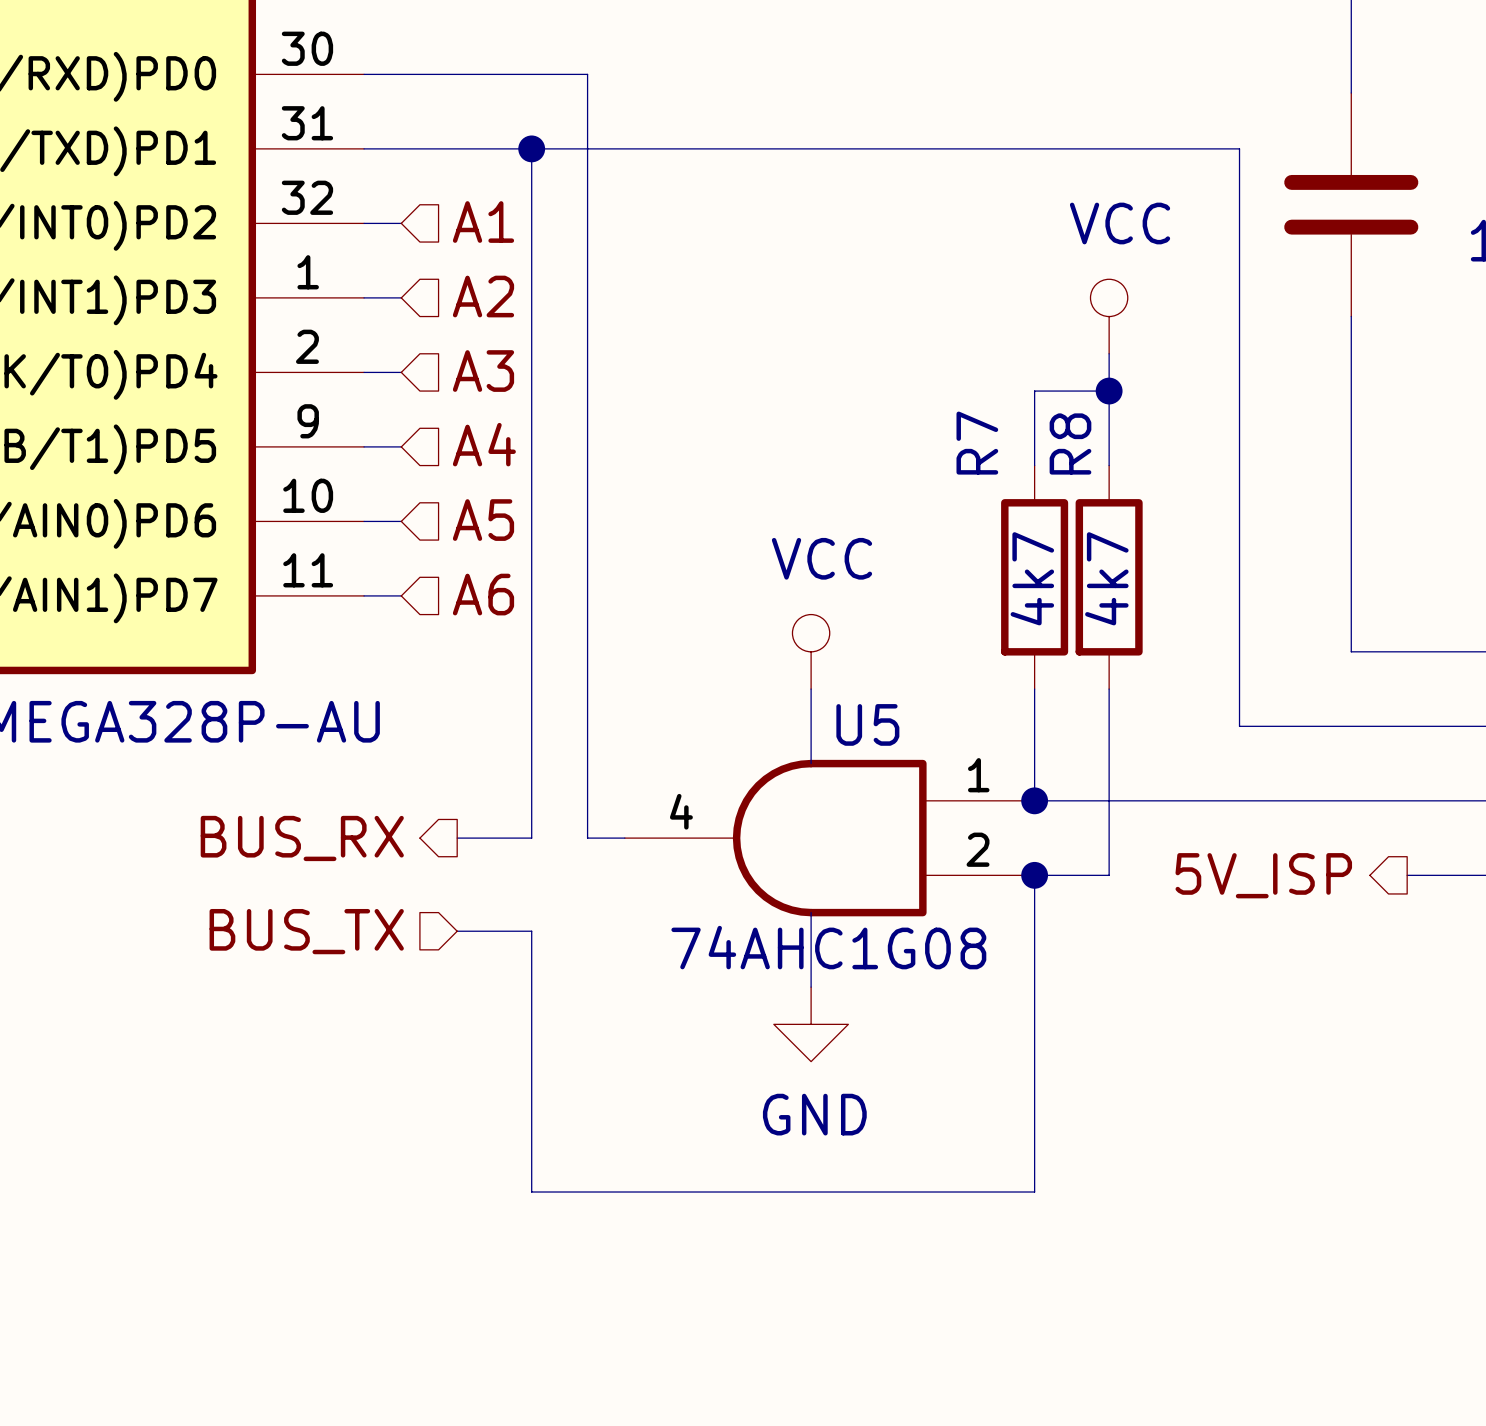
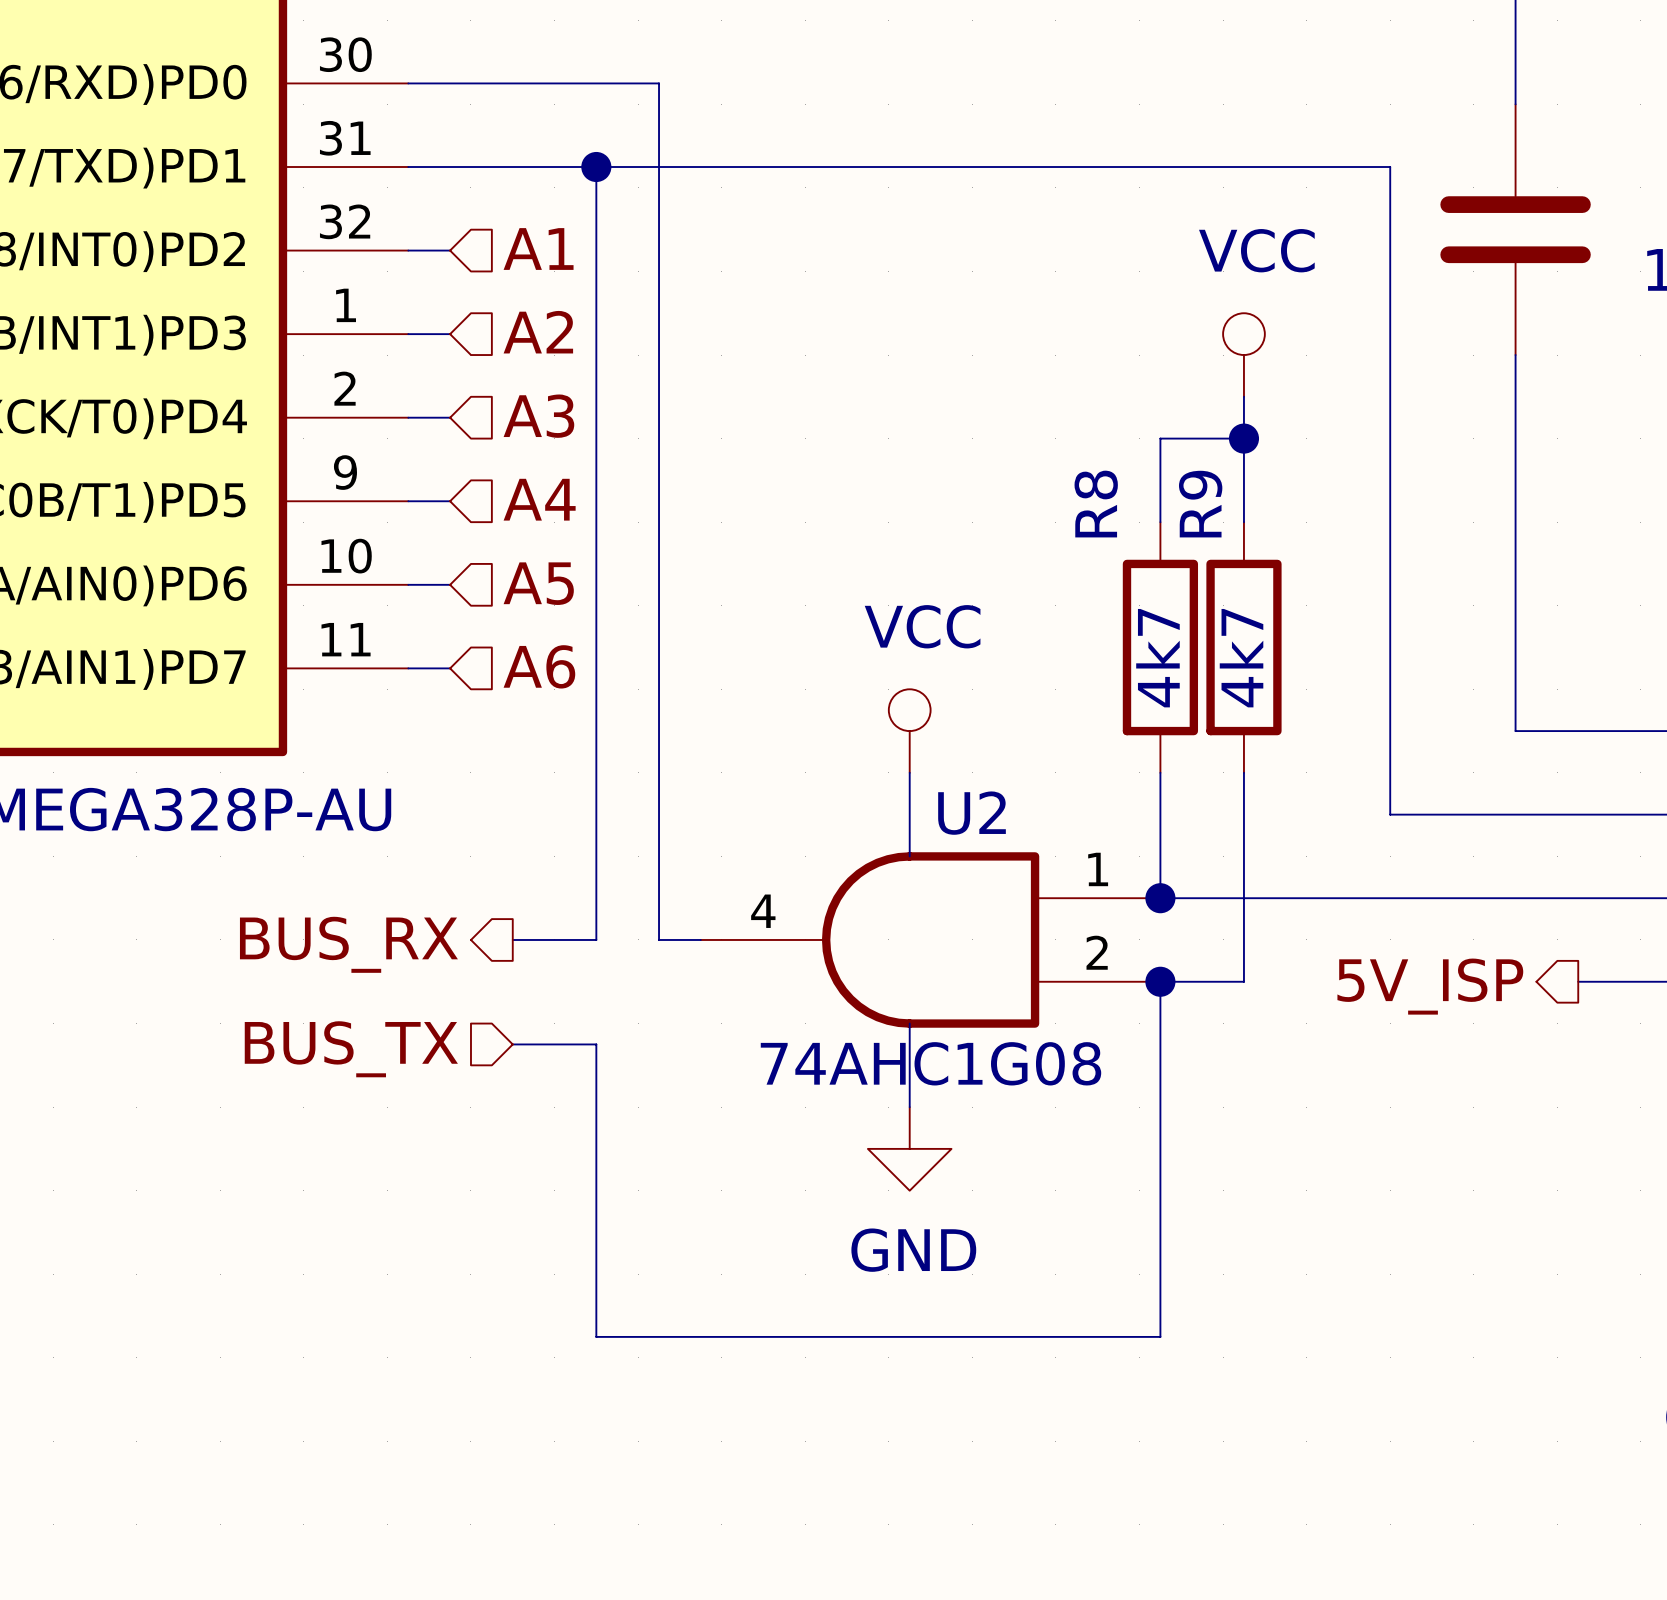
R7 name: R7 (977, 443) -> R8 (1096, 504)
R8 name: R8 (1070, 443) -> R9 (1200, 504)
U5 name: U5 (867, 724) -> U2 (972, 813)

